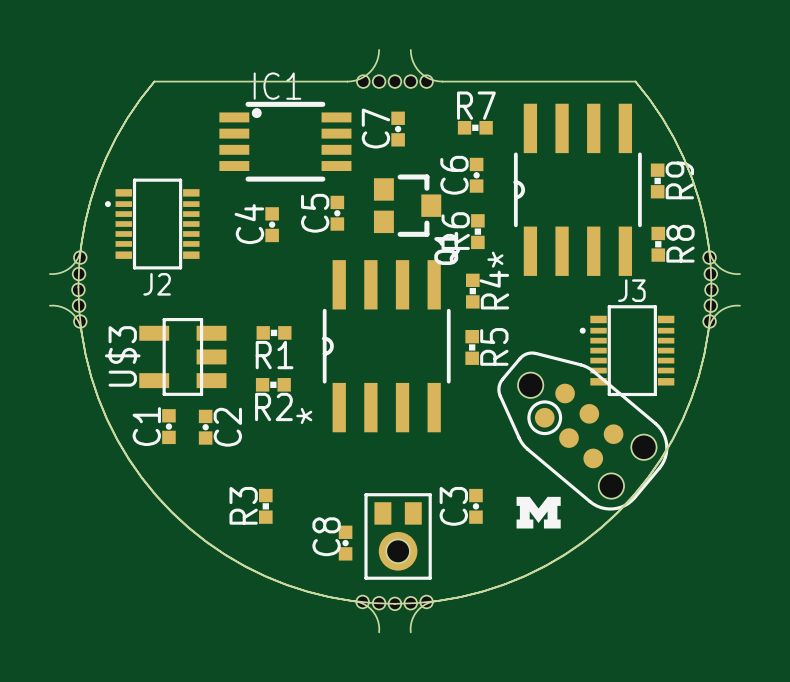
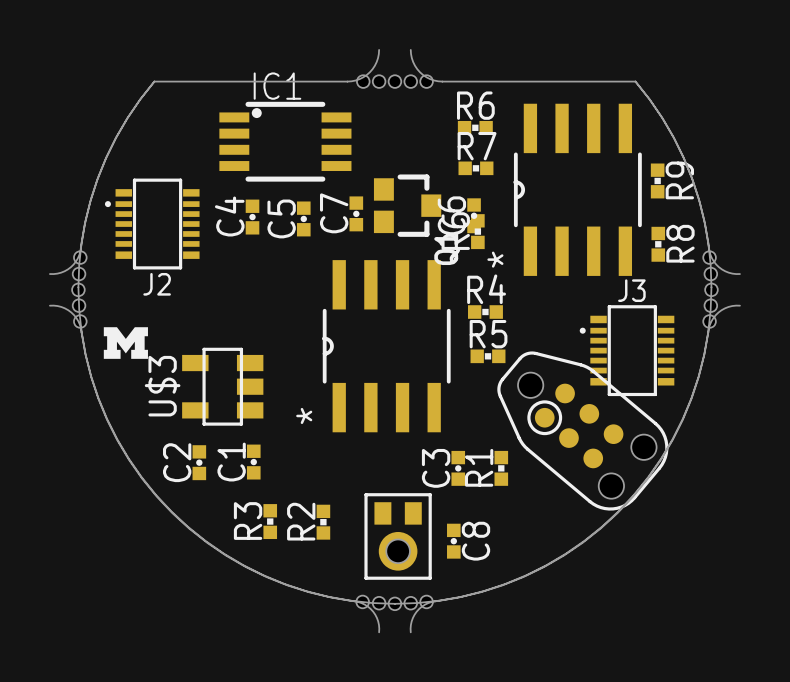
R7 name: R7 (476, 105) -> R6 (475, 105)
C7 position: (398, 129) -> (356, 213)
R7: none -> (475, 168)
C6 position: (476, 175) -> (474, 215)
C5 position: (337, 213) -> (303, 218)
C4 position: (272, 224) -> (252, 217)
R4 rotation: 0° (472, 291) -> 90° clockwise (485, 312)
R4 position: (472, 291) -> (485, 312)
U$3 footprint: [139, 317, 227, 396] -> [182, 347, 264, 426]
R1 rotation: 0° (274, 332) -> 90° clockwise (501, 468)
R1 position: (274, 332) -> (501, 468)
R5 rotation: 0° (472, 347) -> 90° clockwise (488, 356)
R2 rotation: 0° (273, 384) -> 90° clockwise (323, 522)
R2 position: (273, 384) -> (323, 522)
C1 position: (168, 426) -> (253, 462)
C2 position: (205, 427) -> (199, 462)
C2 name position: C2 (227, 427) -> C2 (177, 462)
R3 position: (265, 506) -> (270, 521)
C3 position: (475, 506) -> (458, 468)
drawing position: (538, 512) -> (125, 343)
C8 name position: C8 (326, 536) -> C8 (475, 541)
C8 position: (345, 543) -> (453, 541)

